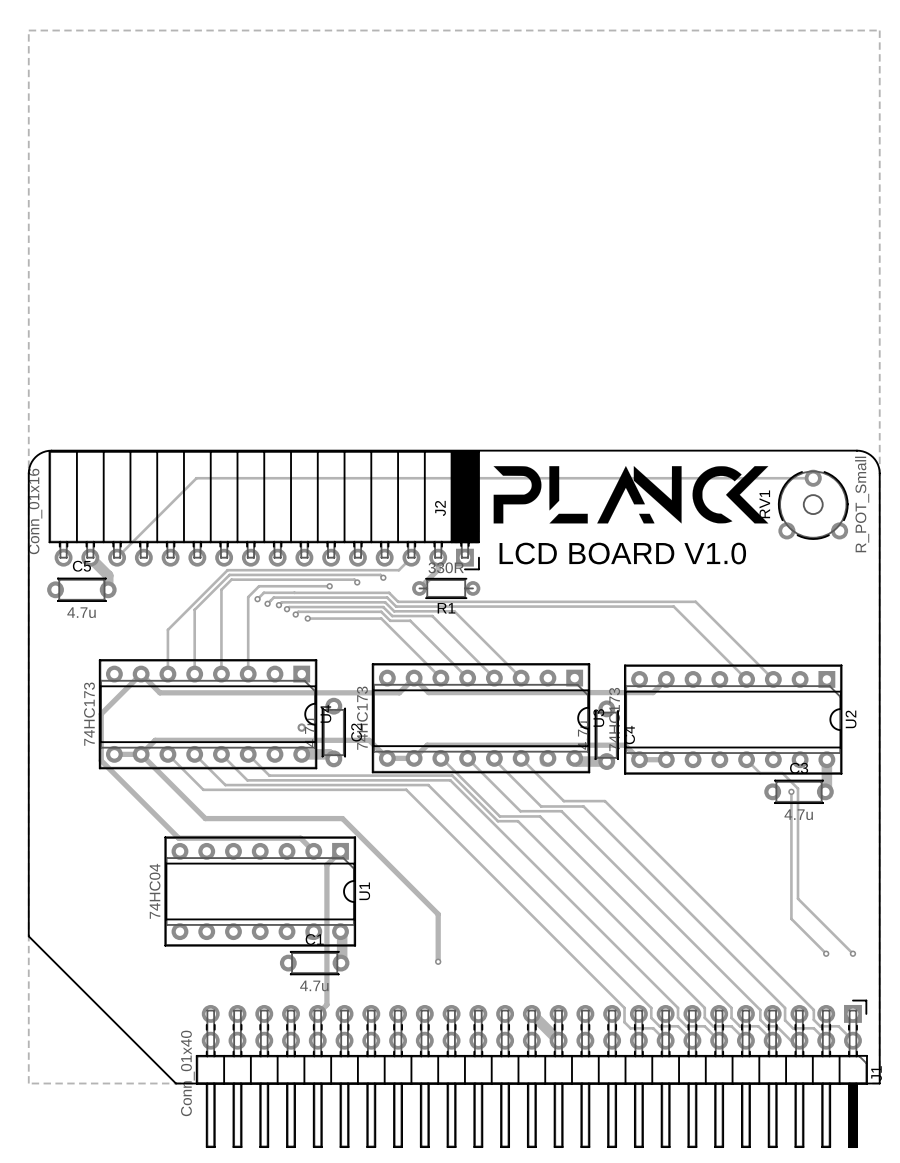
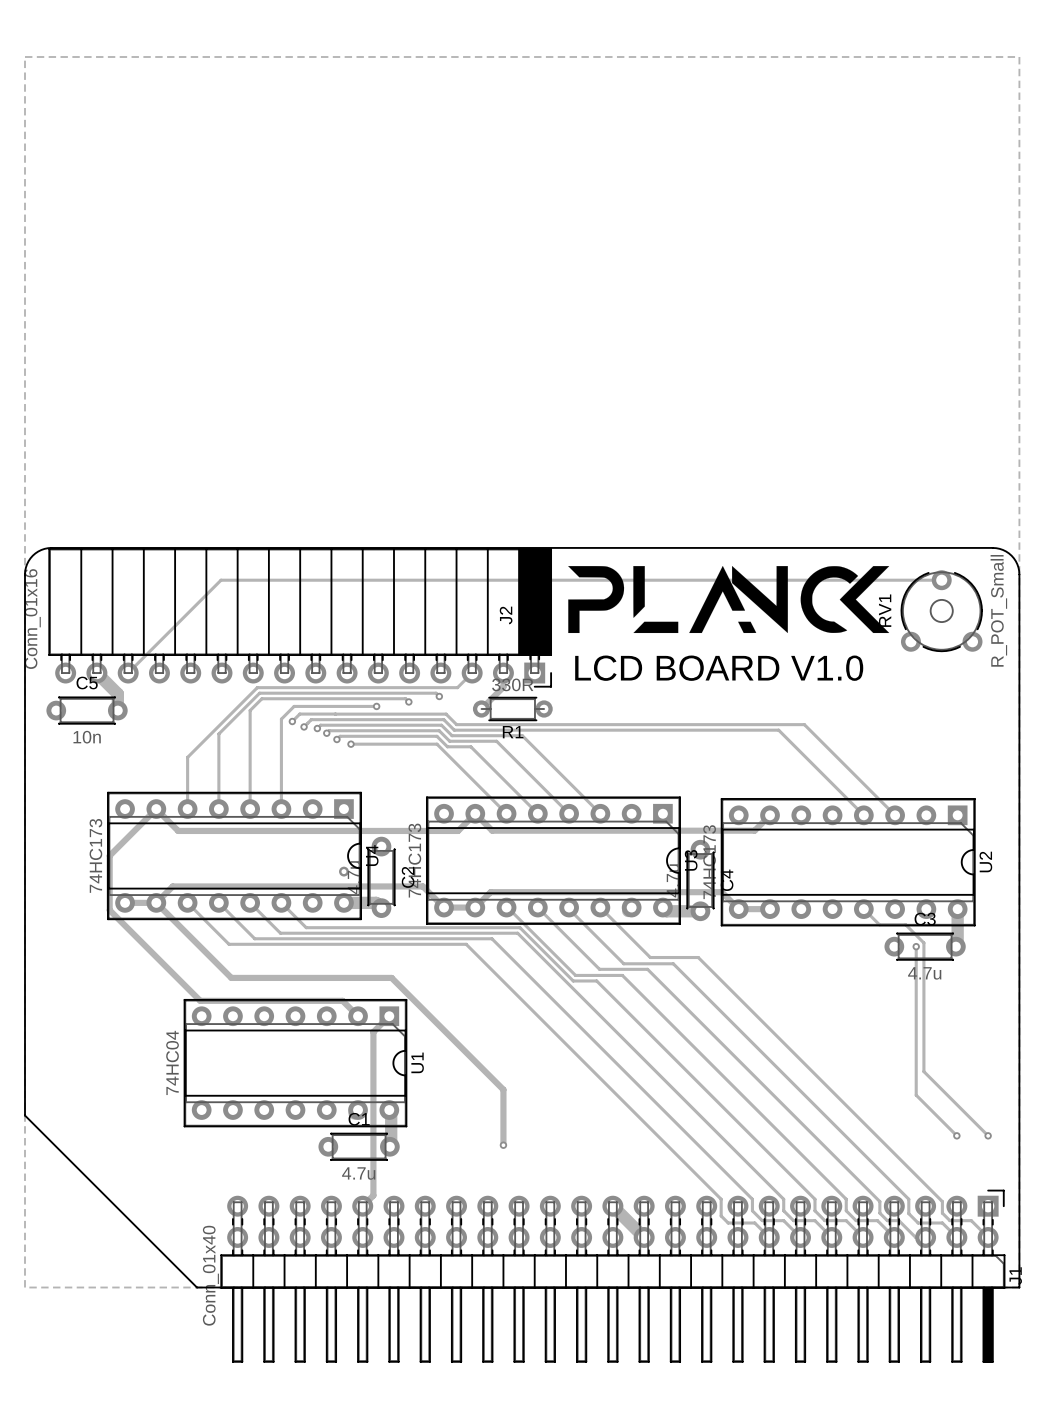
C5 value: 4.7u (81, 612) -> 10n (87, 737)

